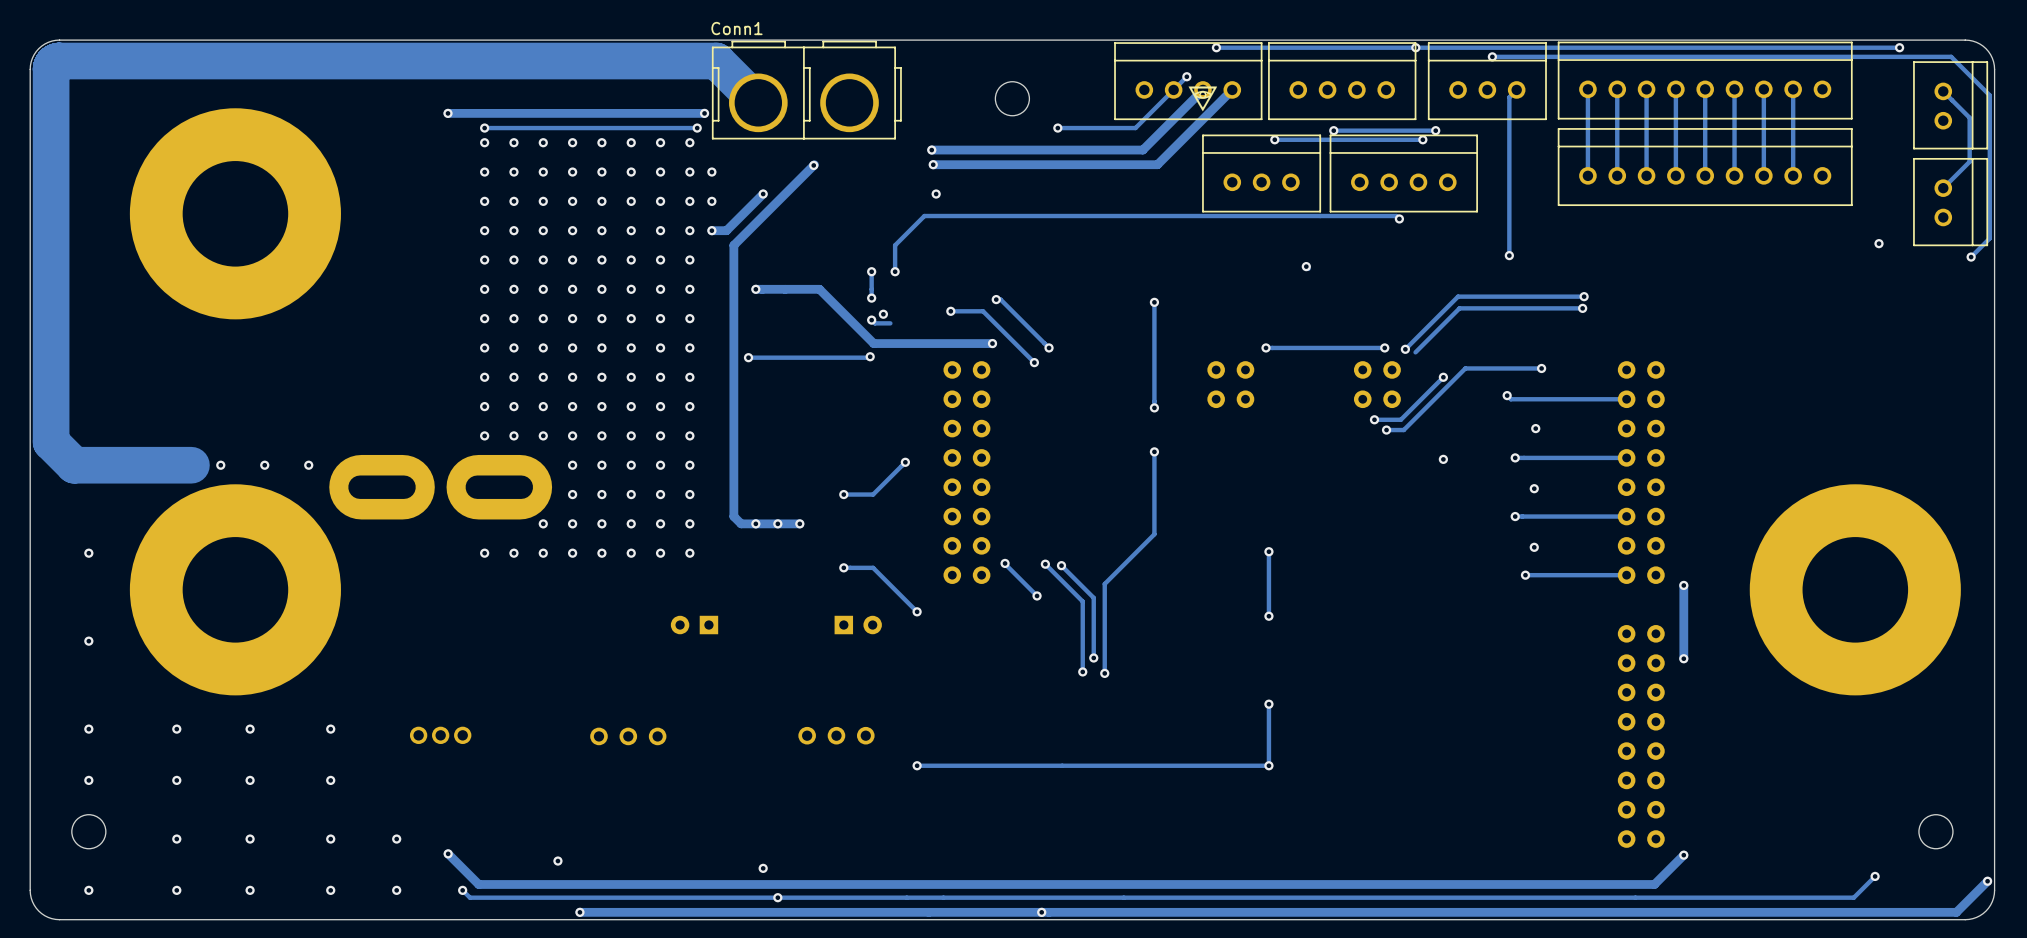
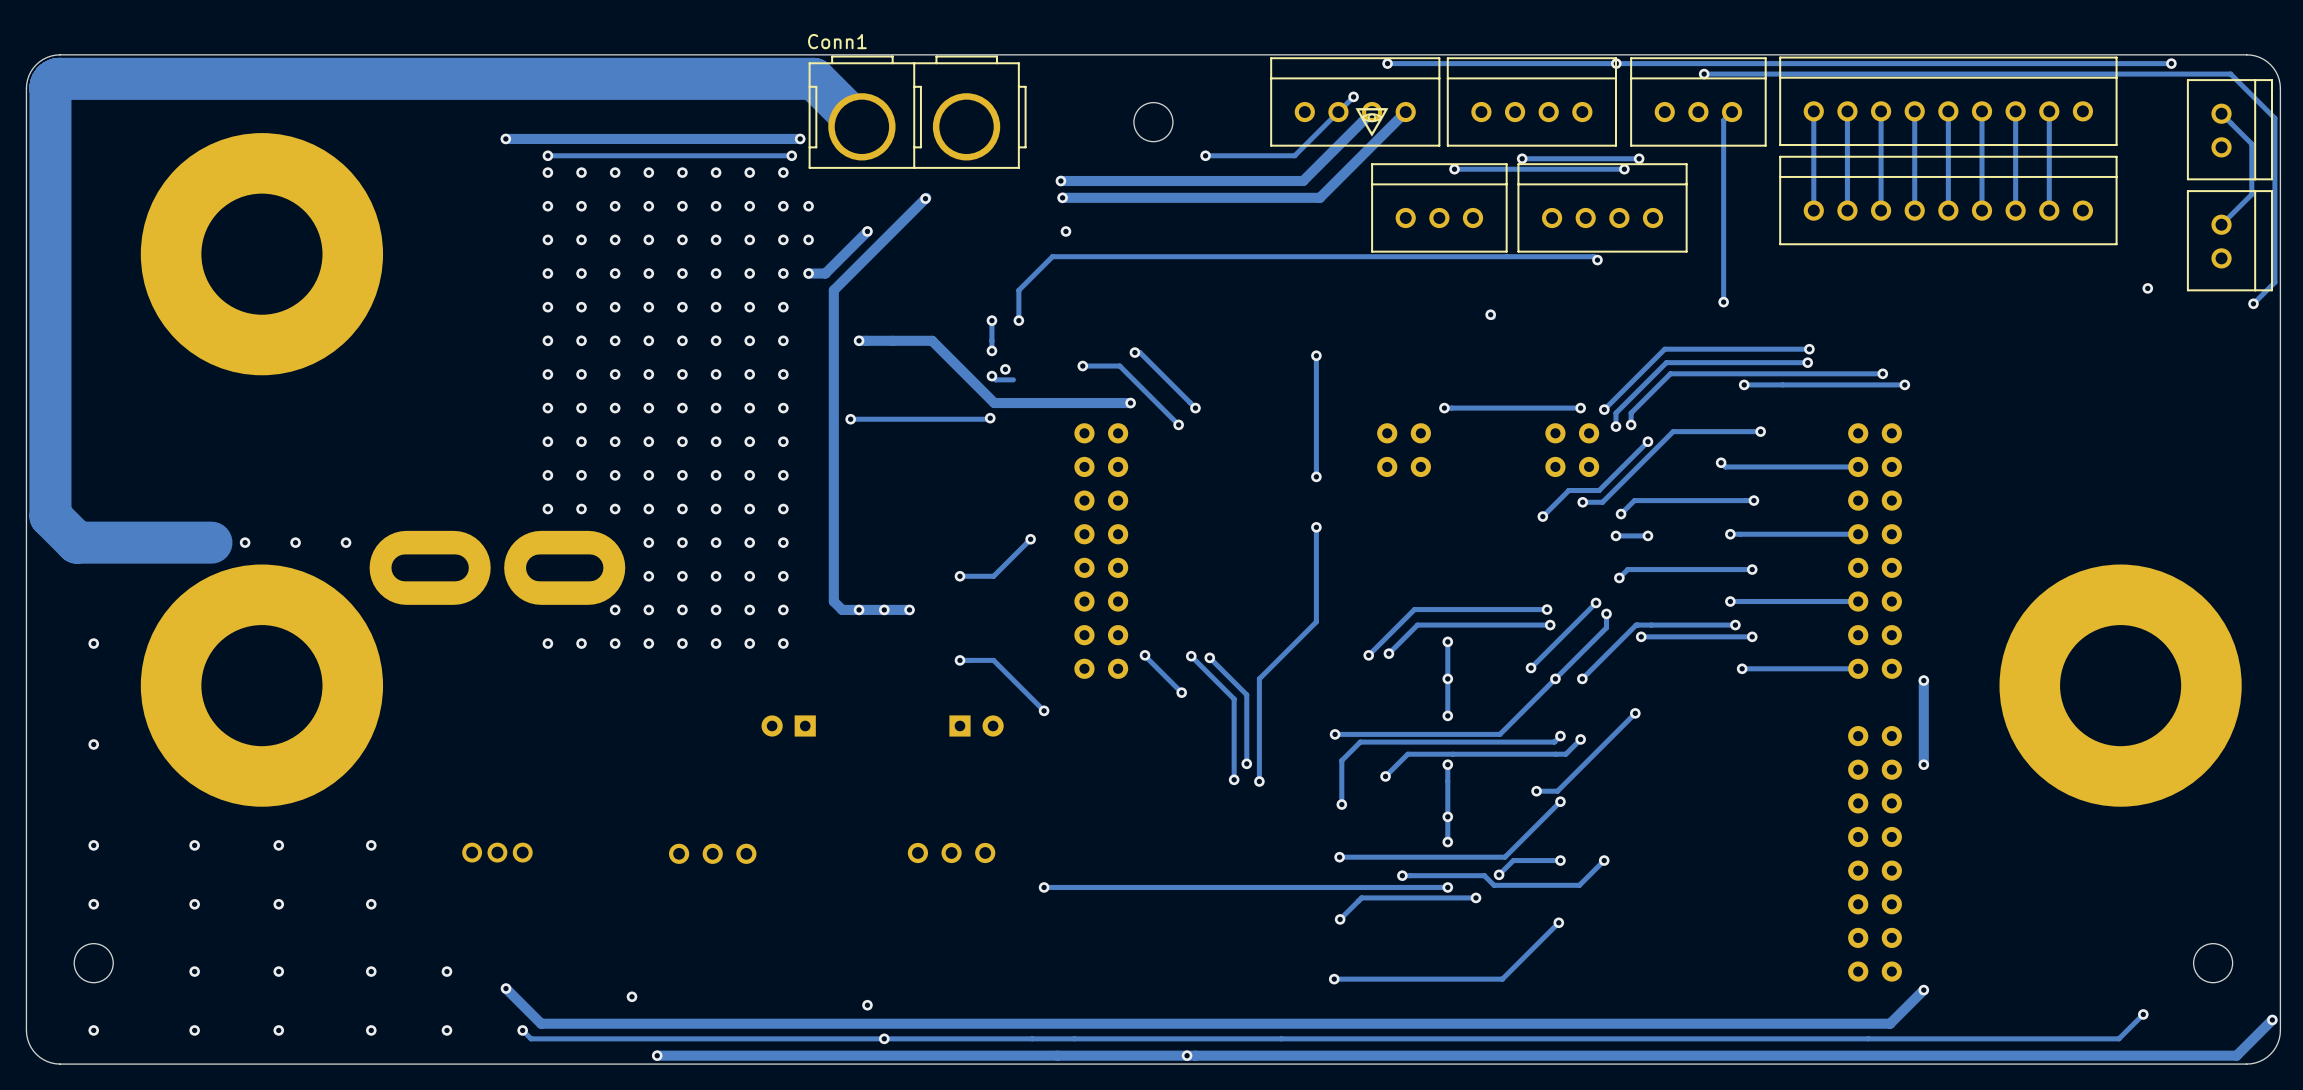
track: none -> (1882, 373) (1670, 373) (1631, 413) (1631, 424)
via: none -> (1882, 373)
via: none -> (1744, 384)
track: none -> (1904, 384) (1744, 384)
via: none -> (1904, 384)
track: none -> (1615, 413) (1615, 426)
via: none -> (1631, 424)
via: none -> (1615, 426)
track: none -> (1568, 490) (1542, 516)
via: (1374, 419) -> none
track: none -> (1753, 500) (1634, 500) (1621, 514)
via: none -> (1621, 514)
via: none -> (1542, 516)
via: none -> (1615, 535)
track: none -> (1647, 535) (1615, 535)
track: none -> (1752, 569) (1627, 569) (1619, 577)
via: none -> (1619, 577)
track: none -> (1596, 602) (1531, 667)
via: none -> (1596, 602)
track: none -> (1547, 609) (1414, 609) (1368, 655)
via: none -> (1547, 609)
track: none -> (1606, 613) (1606, 627) (1499, 734) (1335, 734)
via: none -> (1606, 613)
track: none -> (1550, 625) (1417, 625) (1388, 653)
via: none -> (1550, 625)
track: none -> (1735, 625) (1636, 625) (1582, 678)
via: none -> (1735, 625)
via: none -> (1641, 636)
track: none -> (1752, 636) (1641, 636)
via: none -> (1388, 653)
via: none -> (1368, 655)
via: none -> (1531, 667)
via: none -> (1447, 678)
via: none -> (1555, 678)
via: none -> (1582, 678)
track: none -> (1635, 713) (1557, 791) (1535, 791)
via: none -> (1635, 713)
via: none -> (1335, 734)
track: none -> (1560, 736) (1554, 742) (1360, 742) (1341, 760) (1341, 804)
via: none -> (1560, 736)
track: none -> (1580, 739) (1565, 754) (1407, 754) (1385, 776)
via: none -> (1580, 739)
track: none -> (1447, 764) (1447, 816)
via: none -> (1447, 764)
via: none -> (1385, 776)
via: none -> (1536, 791)
track: none -> (1560, 801) (1504, 857) (1339, 857)
via: none -> (1560, 801)
via: none -> (1341, 804)
track: (1268, 726) (1268, 765) -> none
via: none -> (1447, 842)
via: none -> (1339, 857)
track: none -> (1560, 860) (1513, 860) (1499, 874)
via: none -> (1560, 860)
track: none -> (1604, 860) (1579, 885) (1494, 885) (1484, 875) (1402, 875)
via: none -> (1604, 860)
via: none -> (1499, 874)
via: none -> (1402, 875)
track: none -> (1476, 897) (1361, 897) (1340, 919)
via: none -> (1476, 897)
via: none -> (1340, 919)
track: none -> (1558, 922) (1502, 979) (1334, 979)
via: none -> (1558, 922)
via: none -> (1334, 979)

